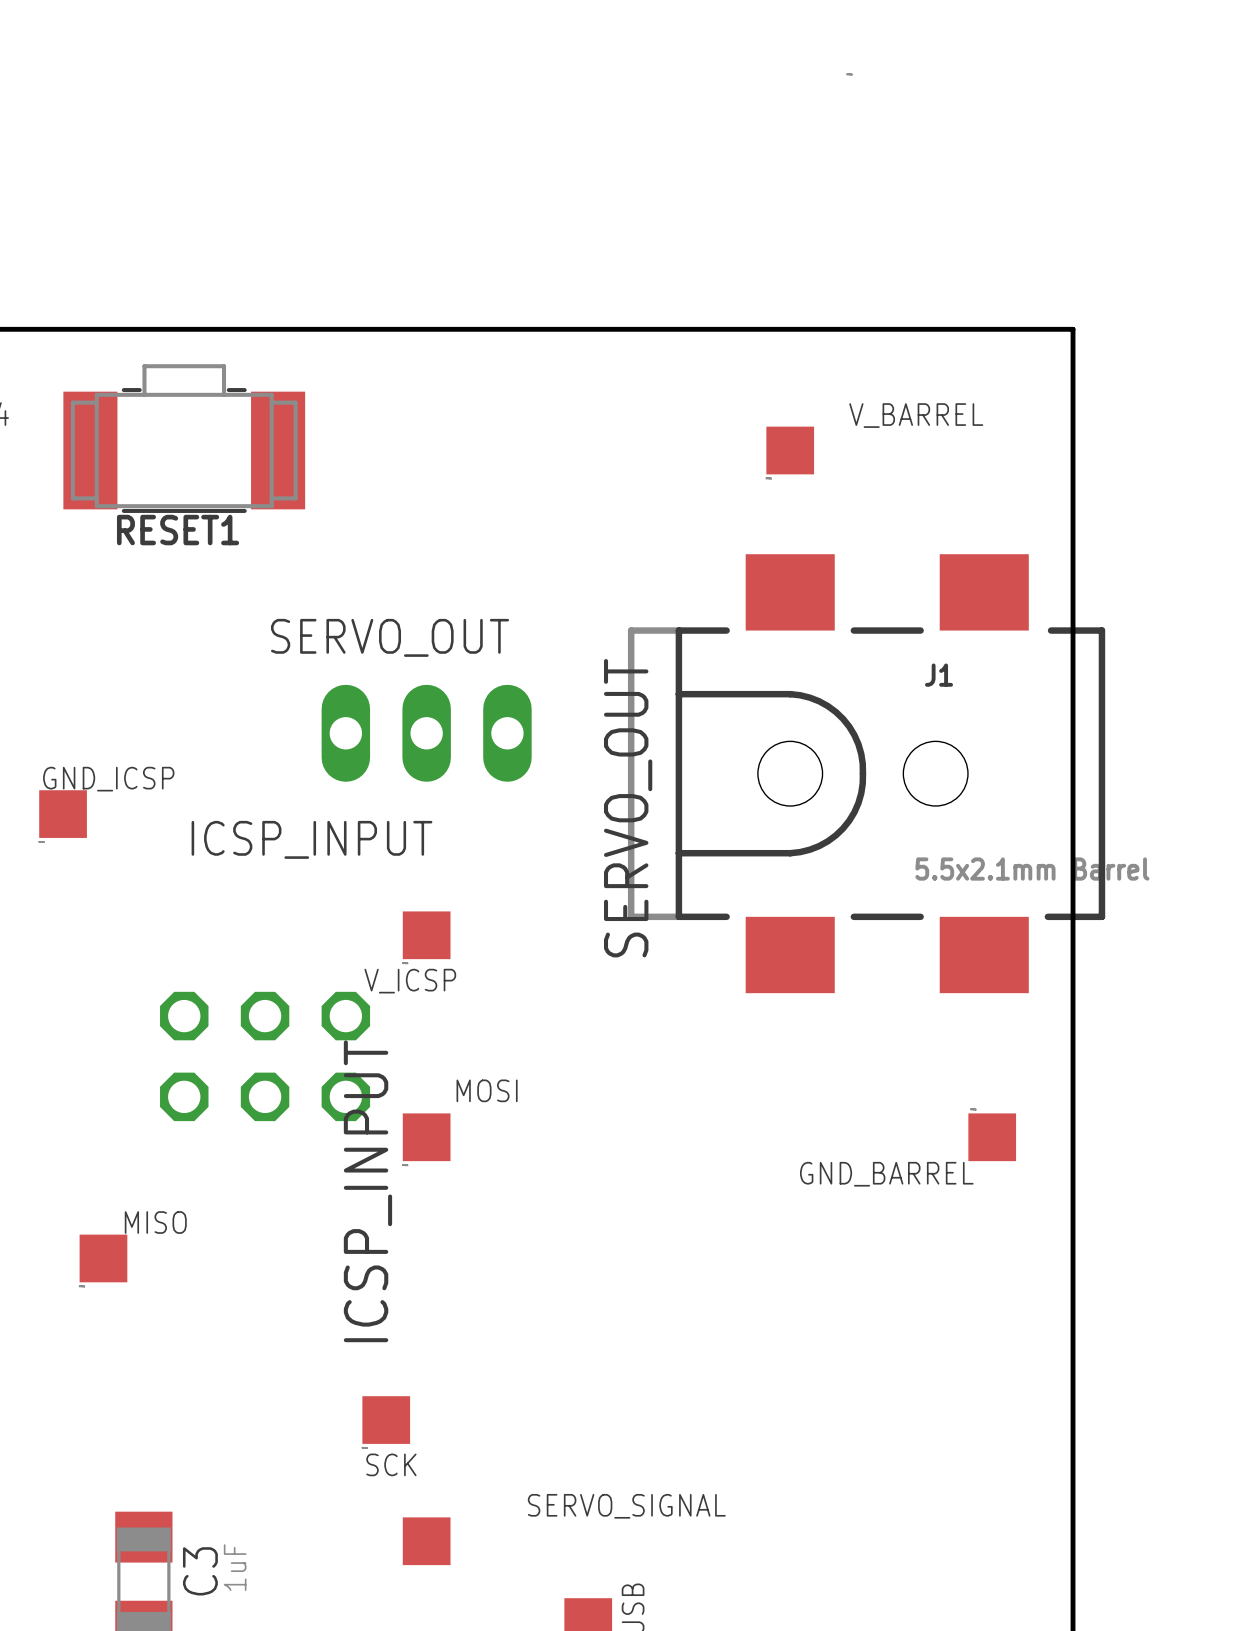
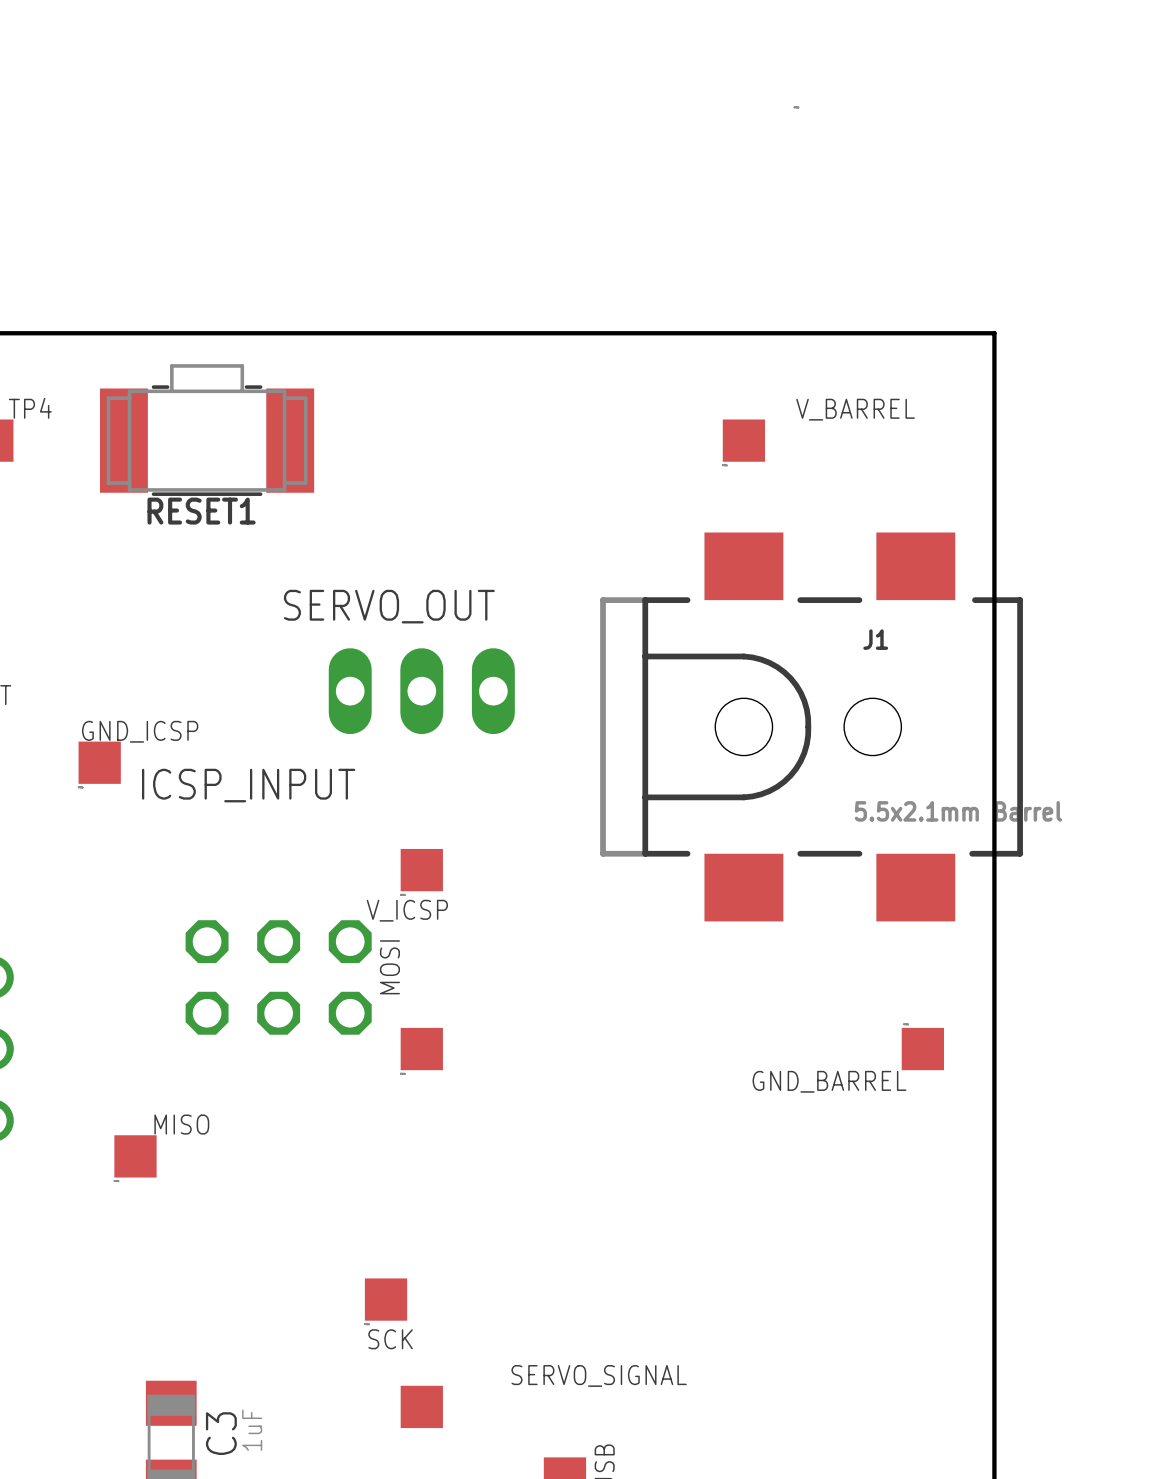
SERVO_OUT name: SERVO_OUT (628, 808) -> none
text position: ICSP_INPUT (312, 839) -> ICSP_INPUT (248, 785)
MOSI name rotation: 0° (487, 1090) -> 90° counterclockwise (389, 967)
MOSI name position: MOSI (487, 1090) -> MOSI (389, 967)
ICSP_INPUT name: ICSP_INPUT (367, 1191) -> none

